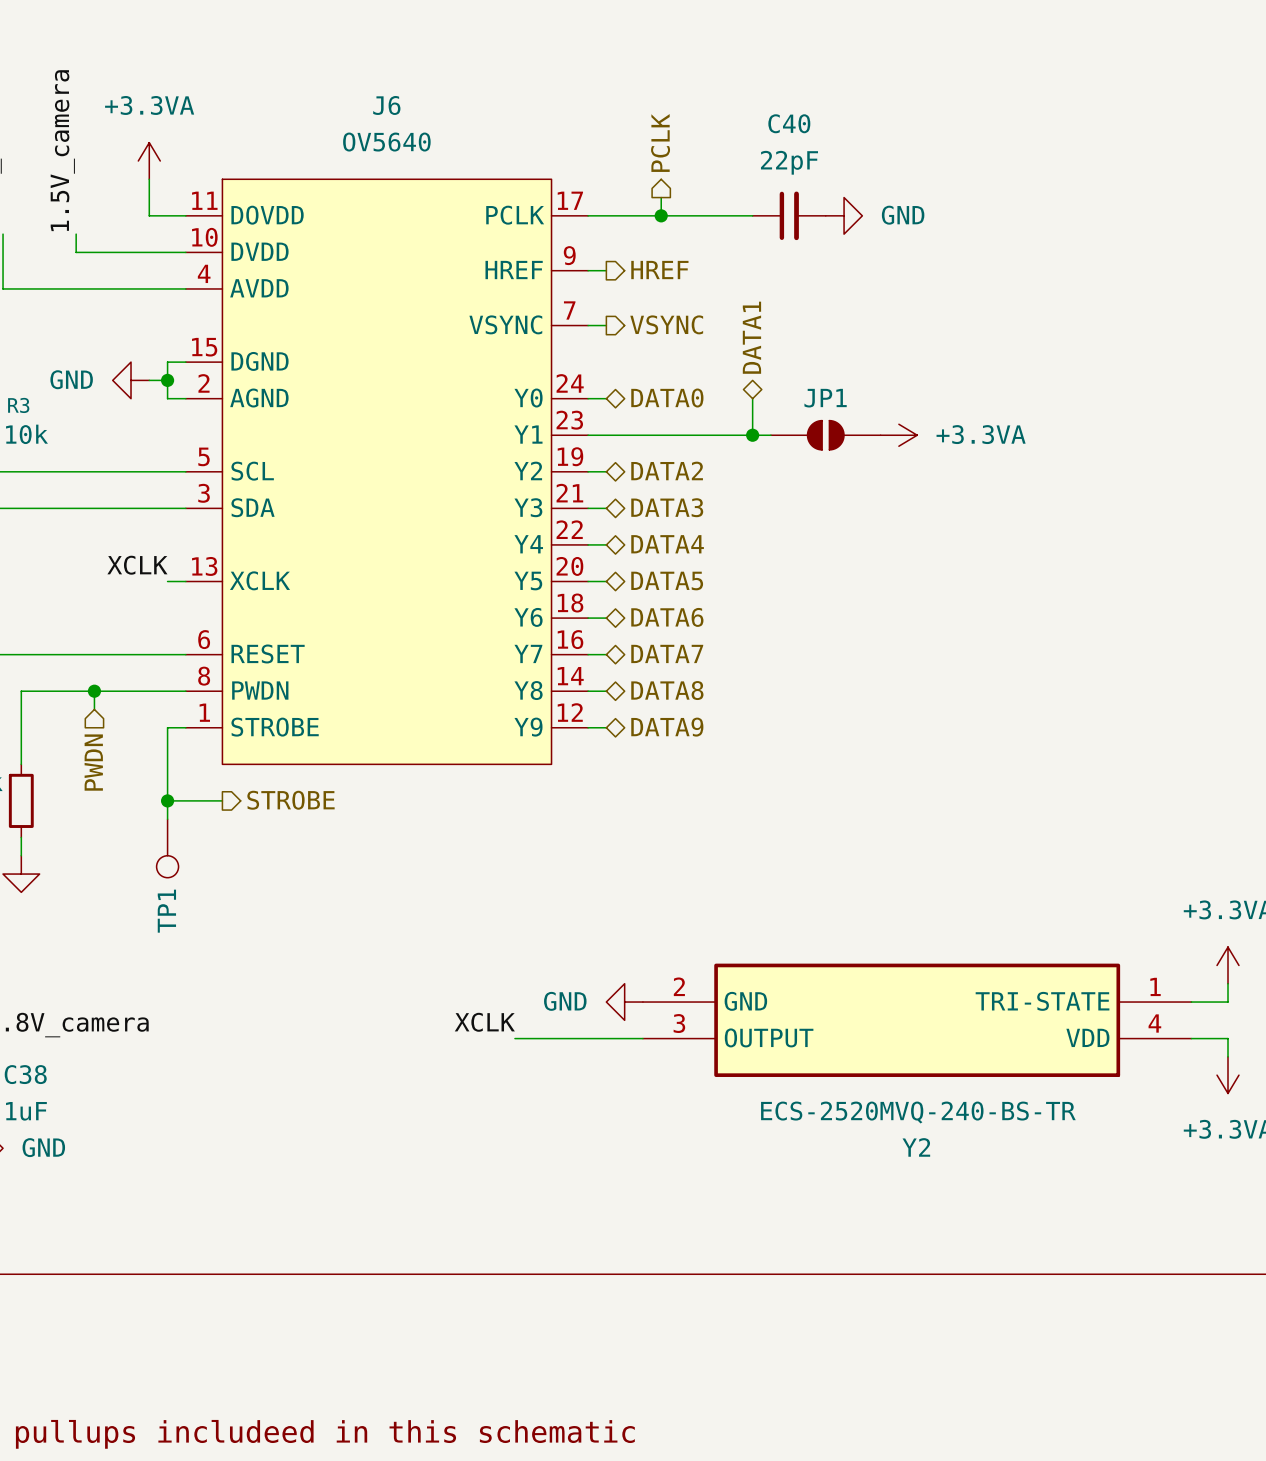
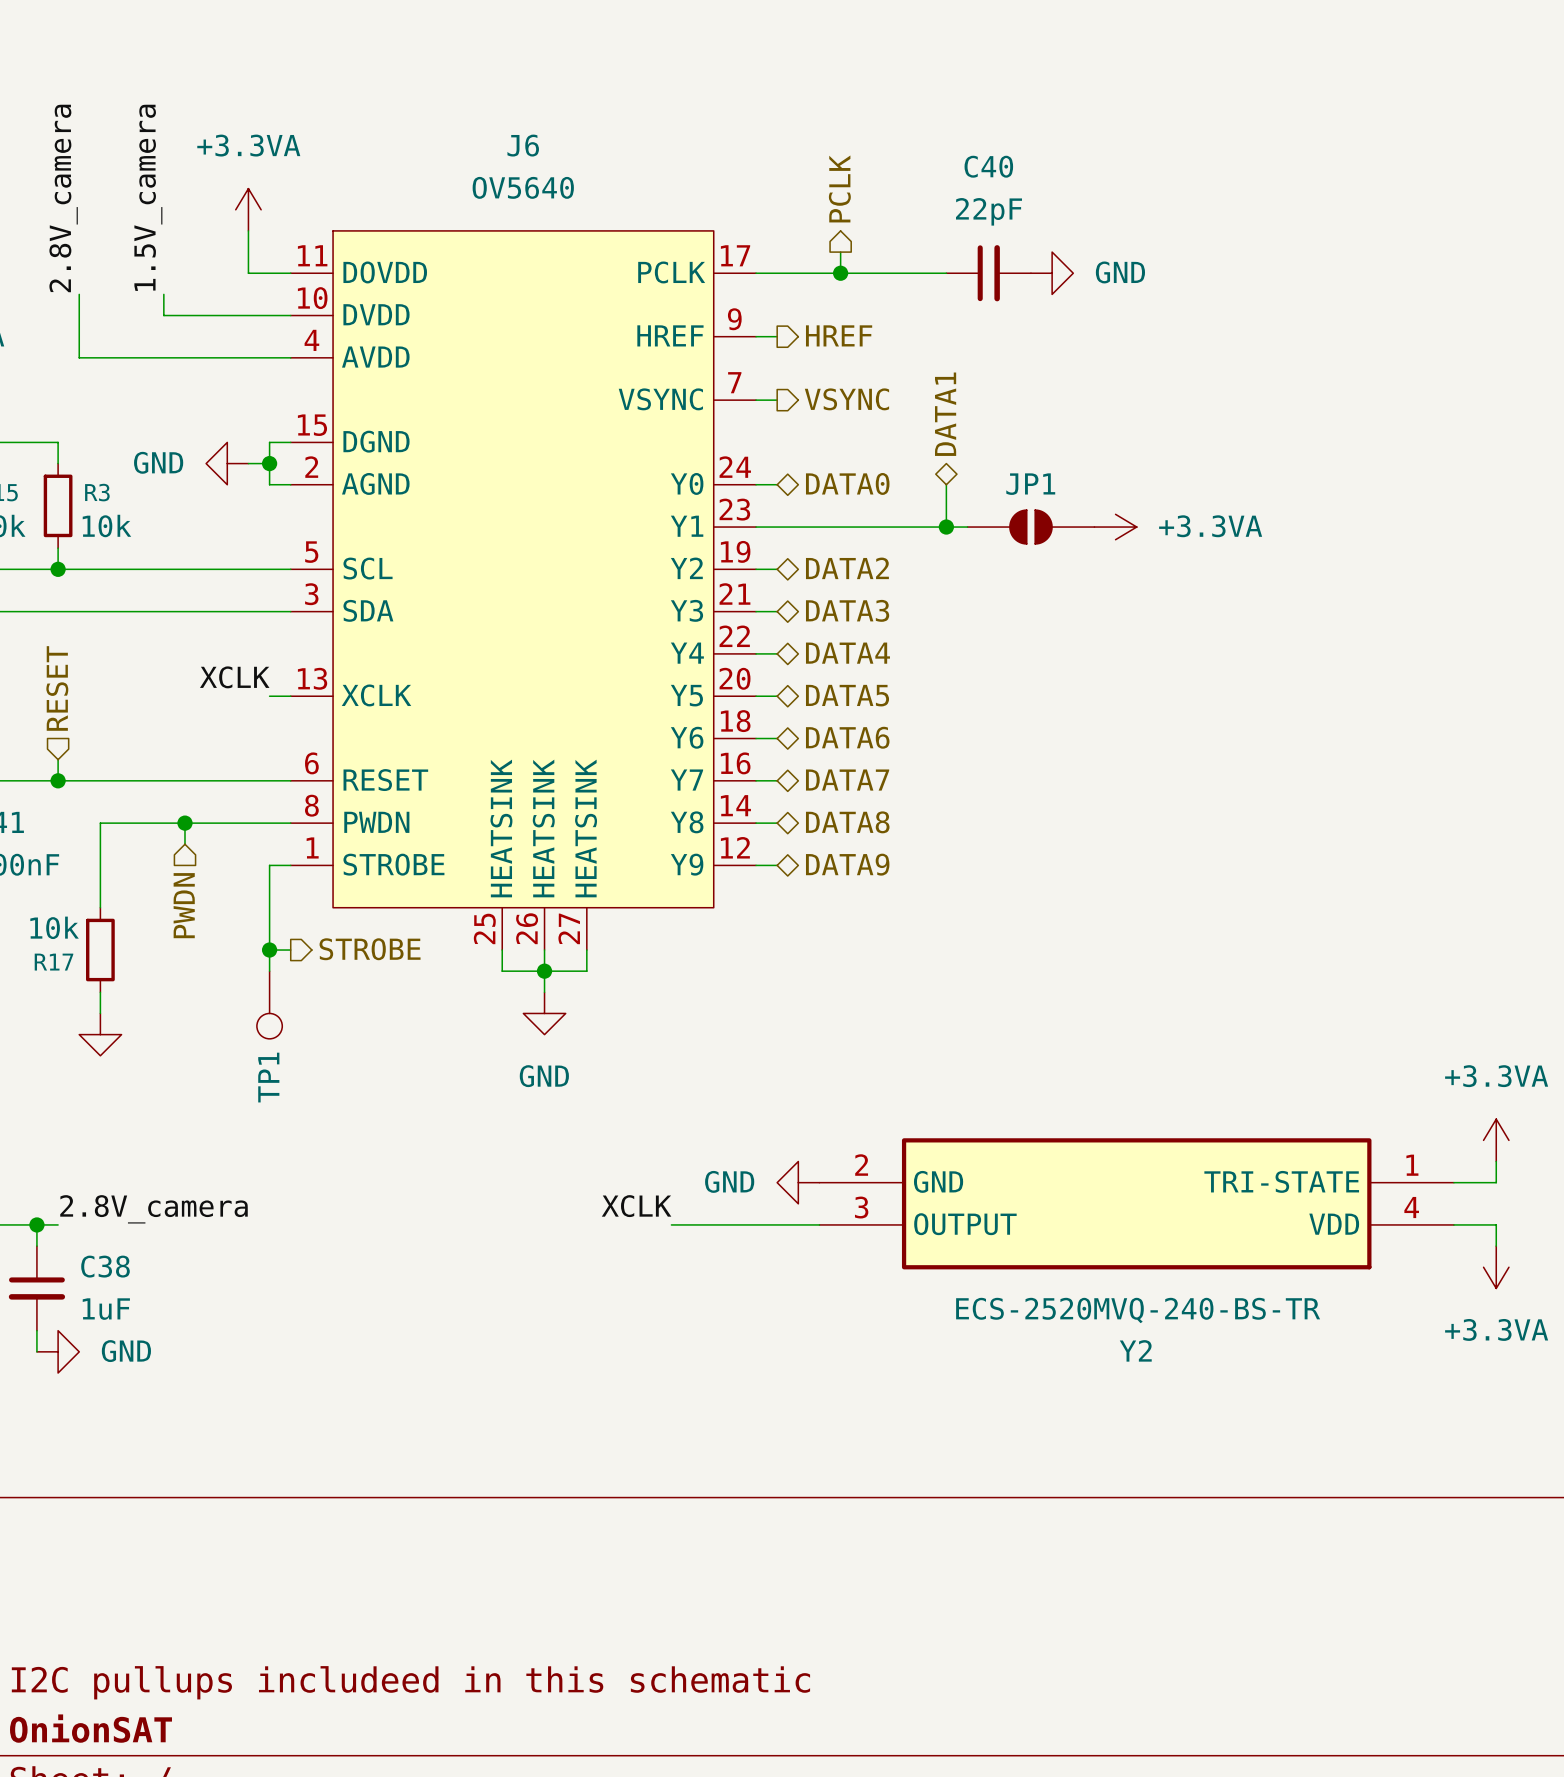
J6 symbol: [185, 179, 589, 765] -> [290, 230, 757, 951]
wire: (185, 800) (222, 800) -> none
hierarchical label position: STROBE (290, 800) -> STROBE (370, 949)
wire: none -> (502, 950) (502, 971) (586, 971) (586, 950)
wire: none -> (544, 950) (544, 992)
junction: none -> (544, 971)
power symbol: none -> GND (544, 1013)

